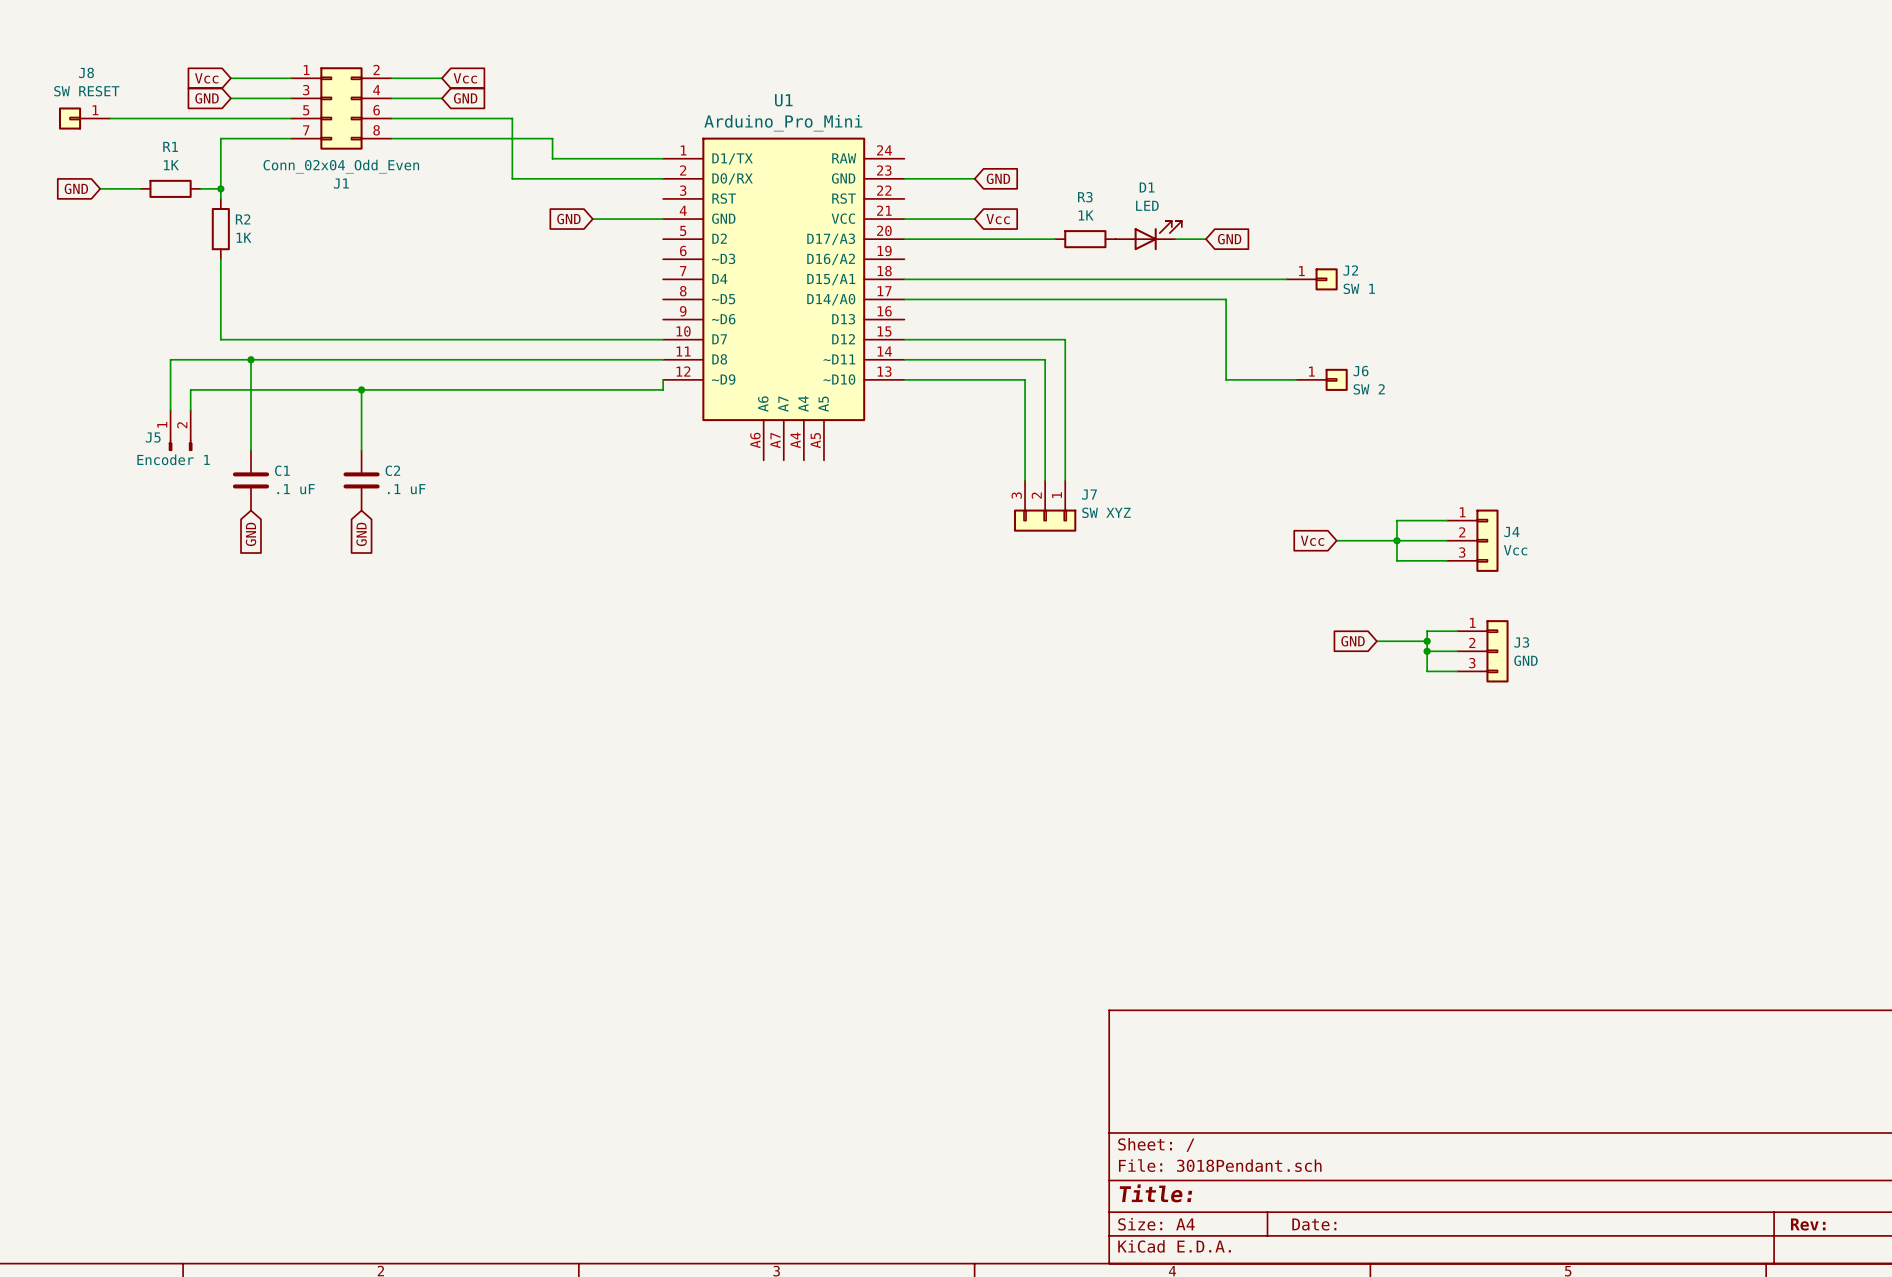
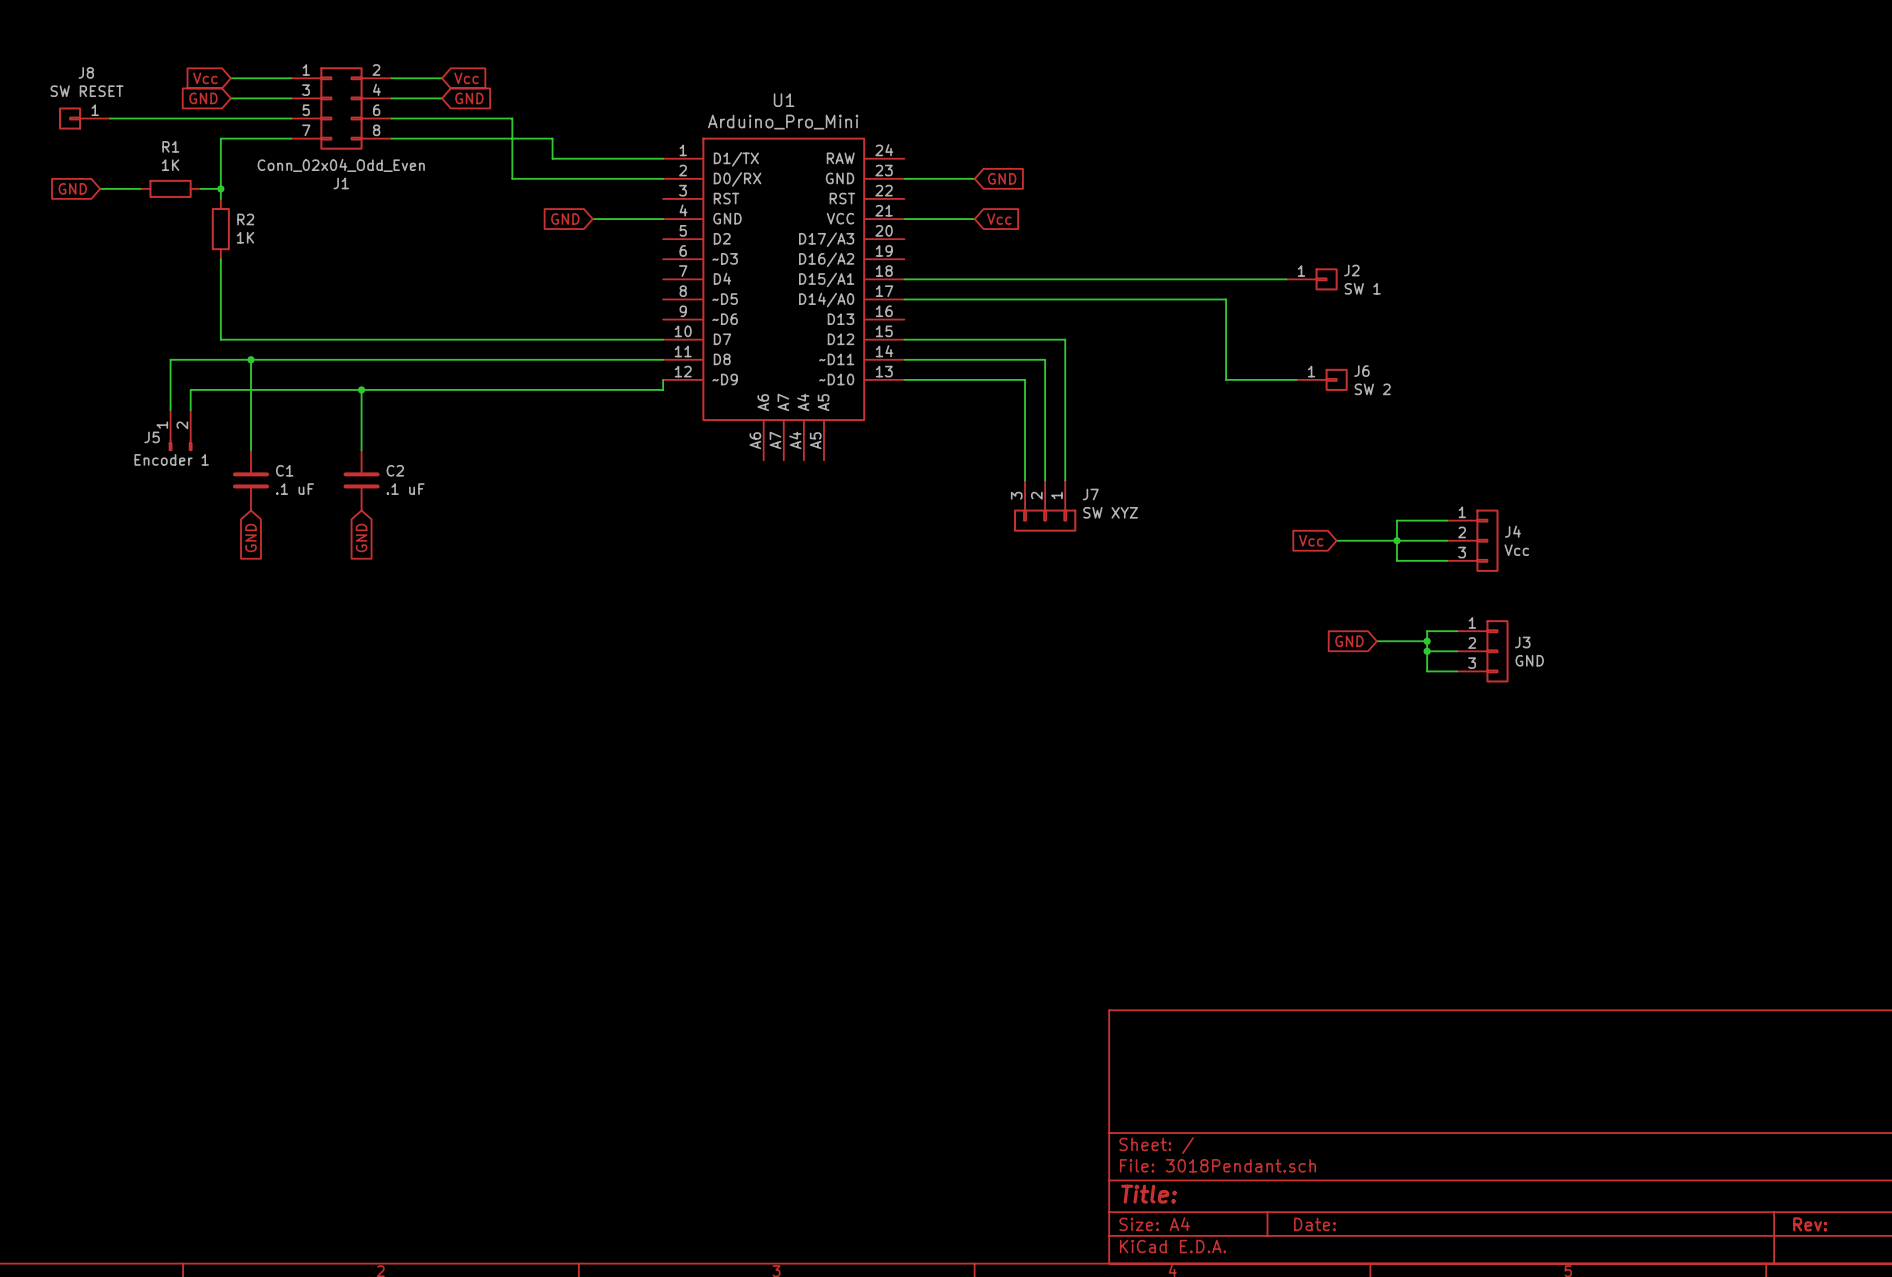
D1: LED (1148, 235) -> none
wire: (904, 239) (1055, 239) -> none
R3: 1K (1085, 239) -> none
wire: (1175, 239) (1205, 239) -> none
global label: GND (1229, 239) -> none

